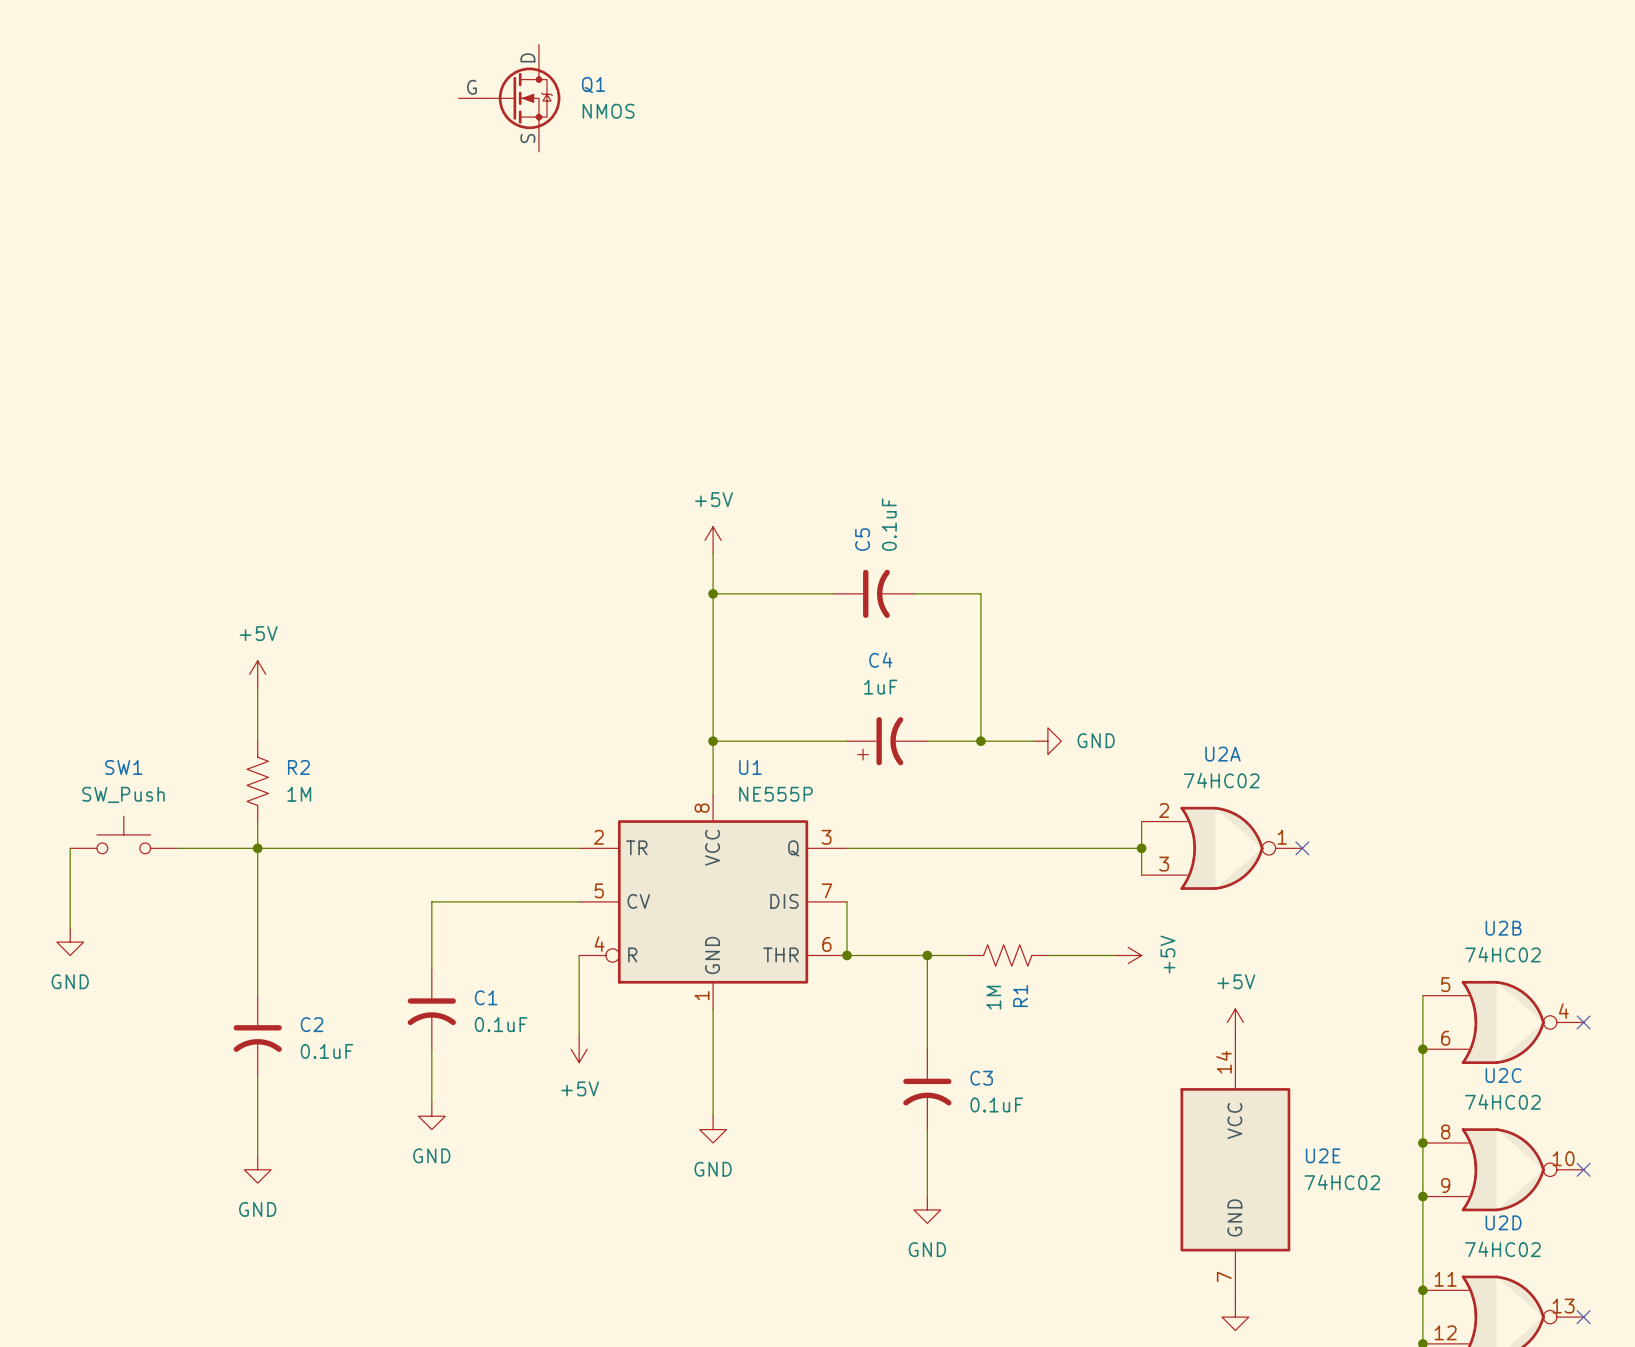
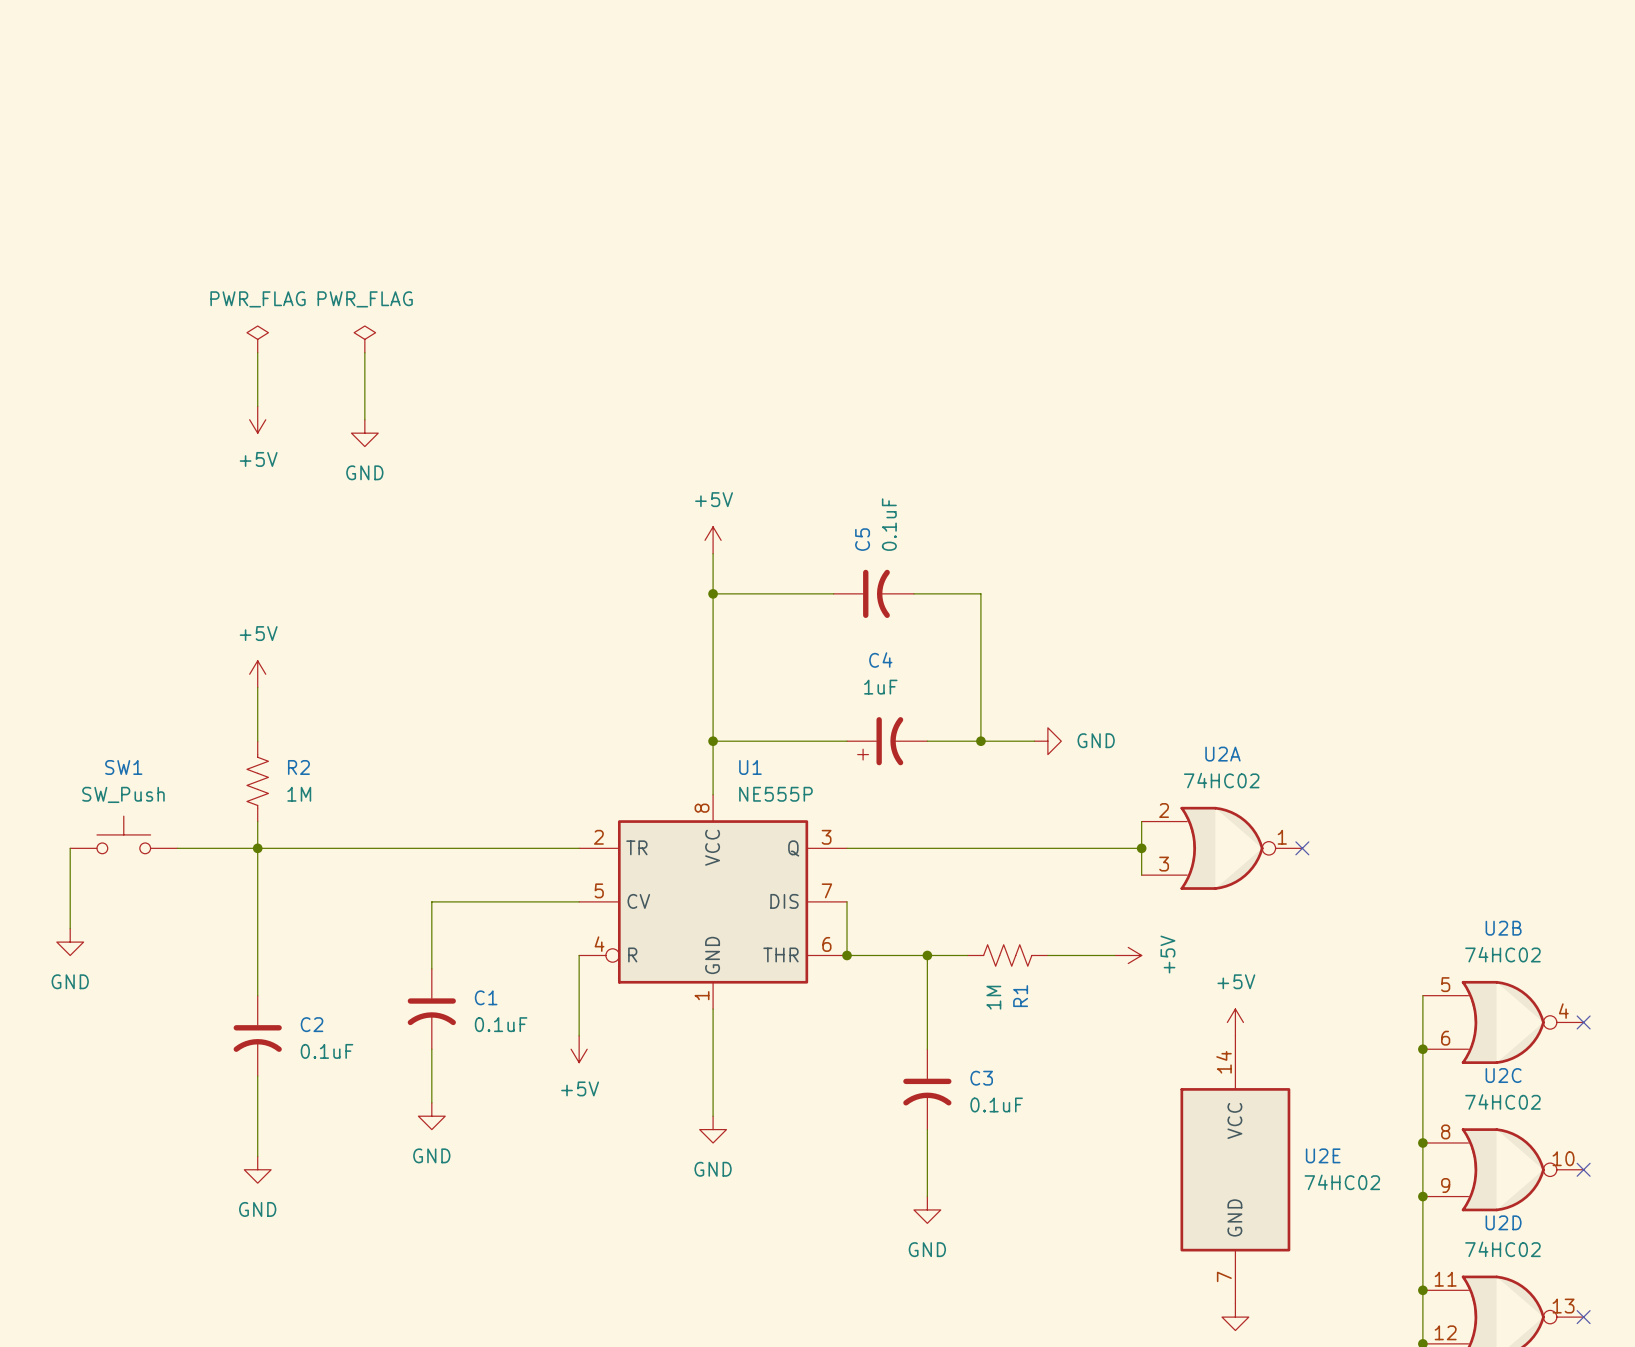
Q1: NMOS (509, 98) -> none
power symbol: none -> PWR_FLAG (257, 339)
power symbol: none -> PWR_FLAG (364, 339)
wire: none -> (257, 352) (257, 406)
wire: none -> (364, 352) (364, 419)
power symbol: none -> +5V (257, 419)
power symbol: none -> GND (364, 433)

